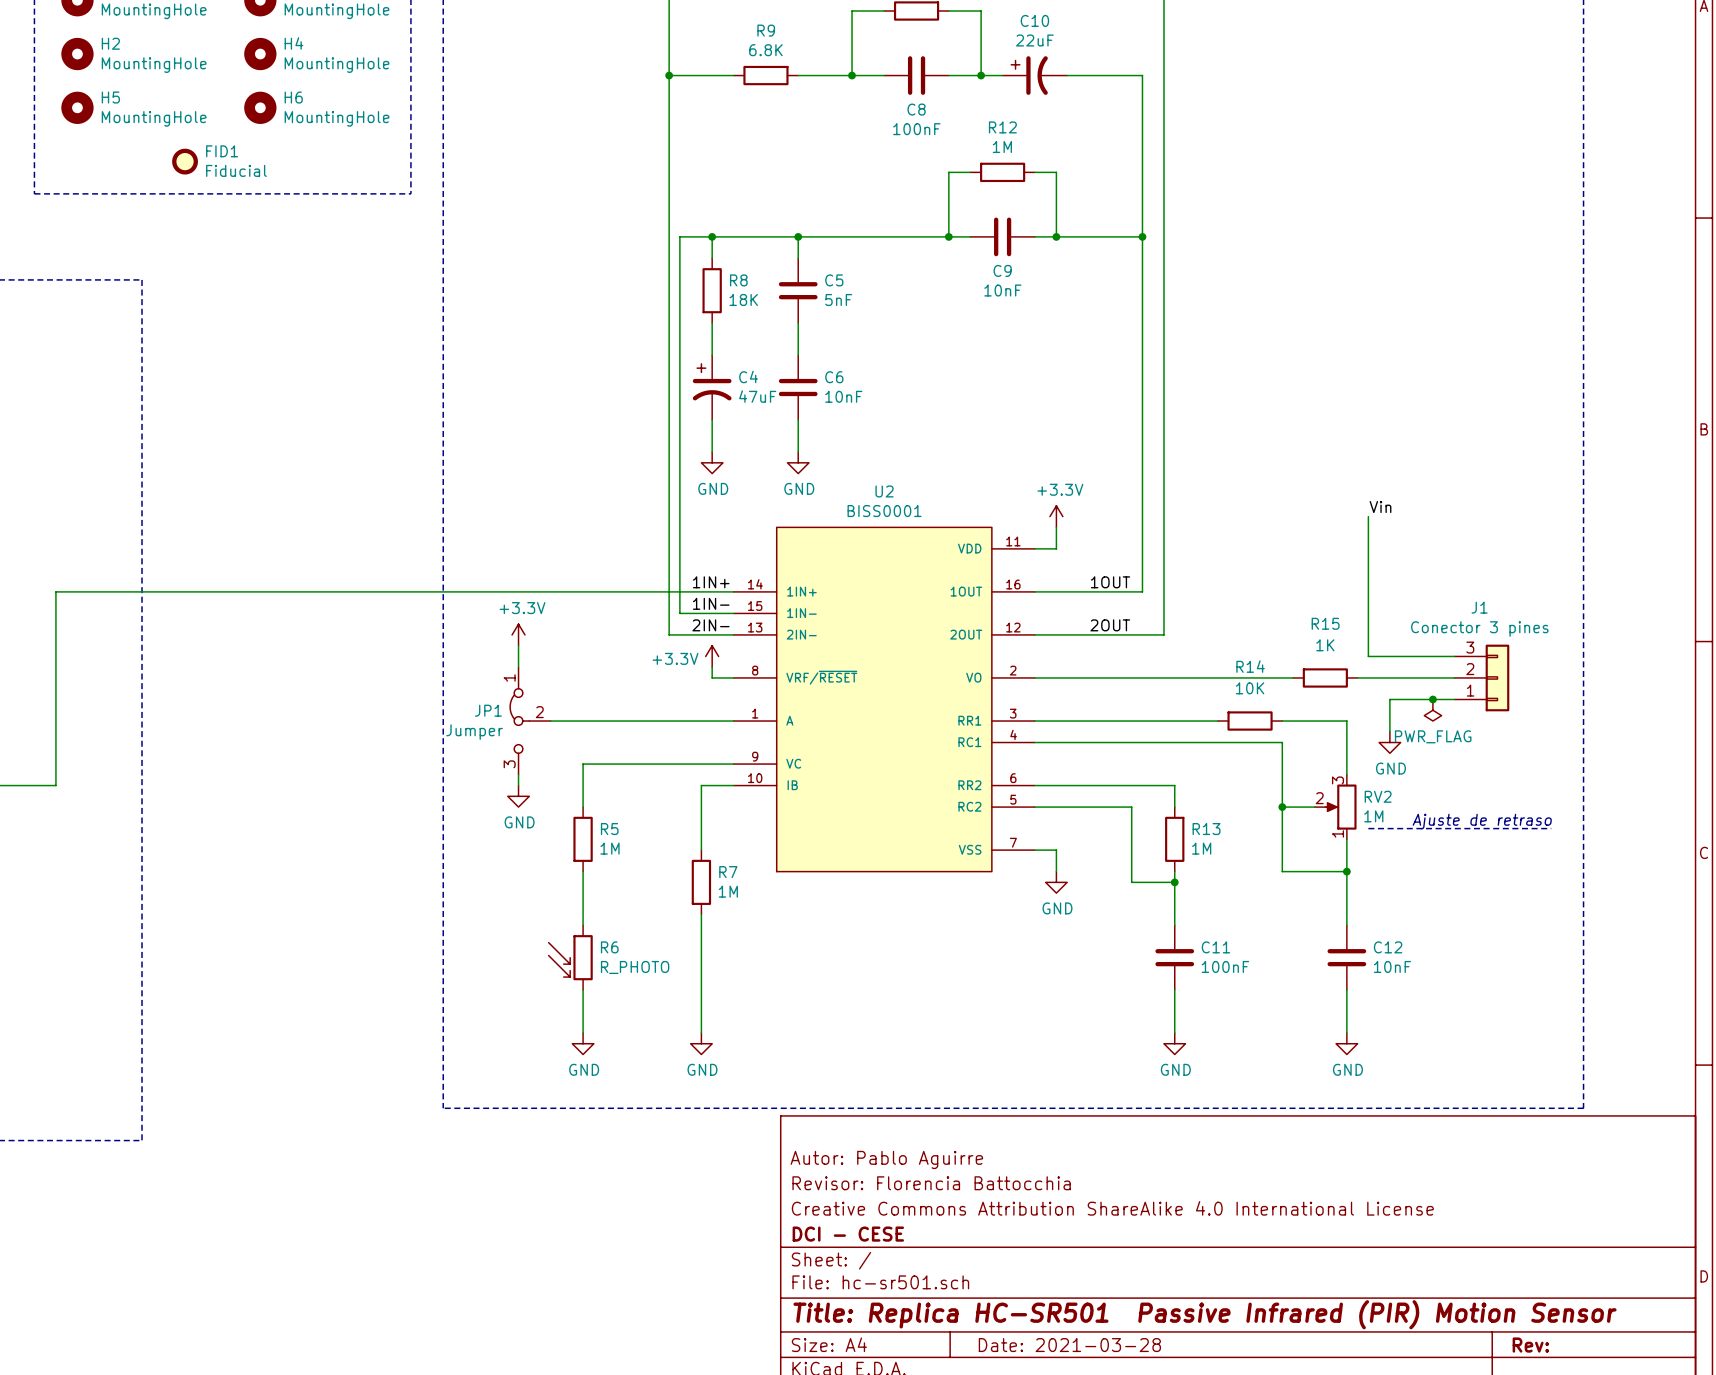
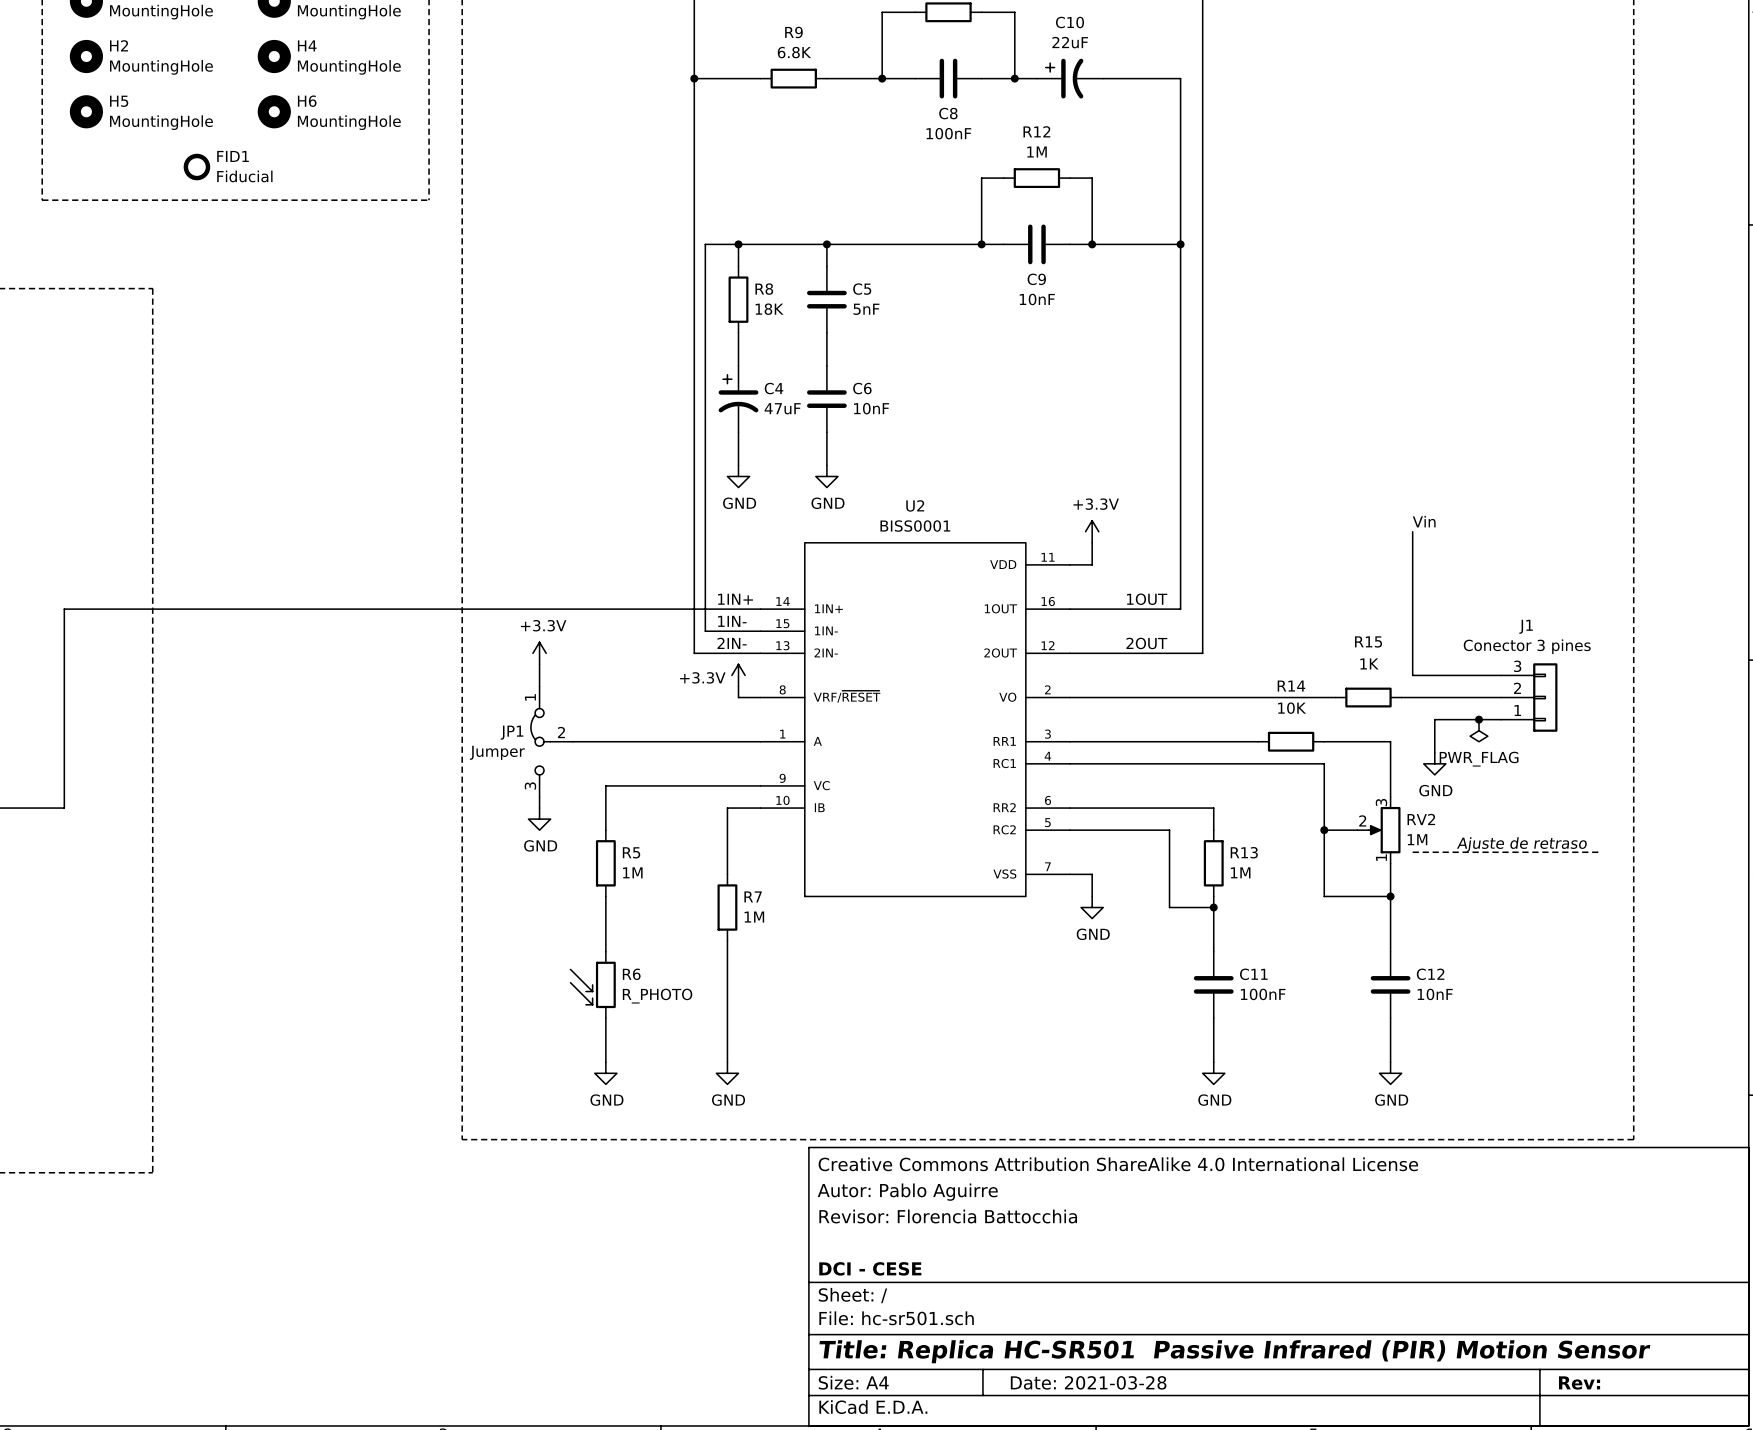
title block position: Creative Commons Attribution ShareAlike 4.0 International License (1112, 1208) -> Creative Commons Attribution ShareAlike 4.0 International License (1118, 1164)

